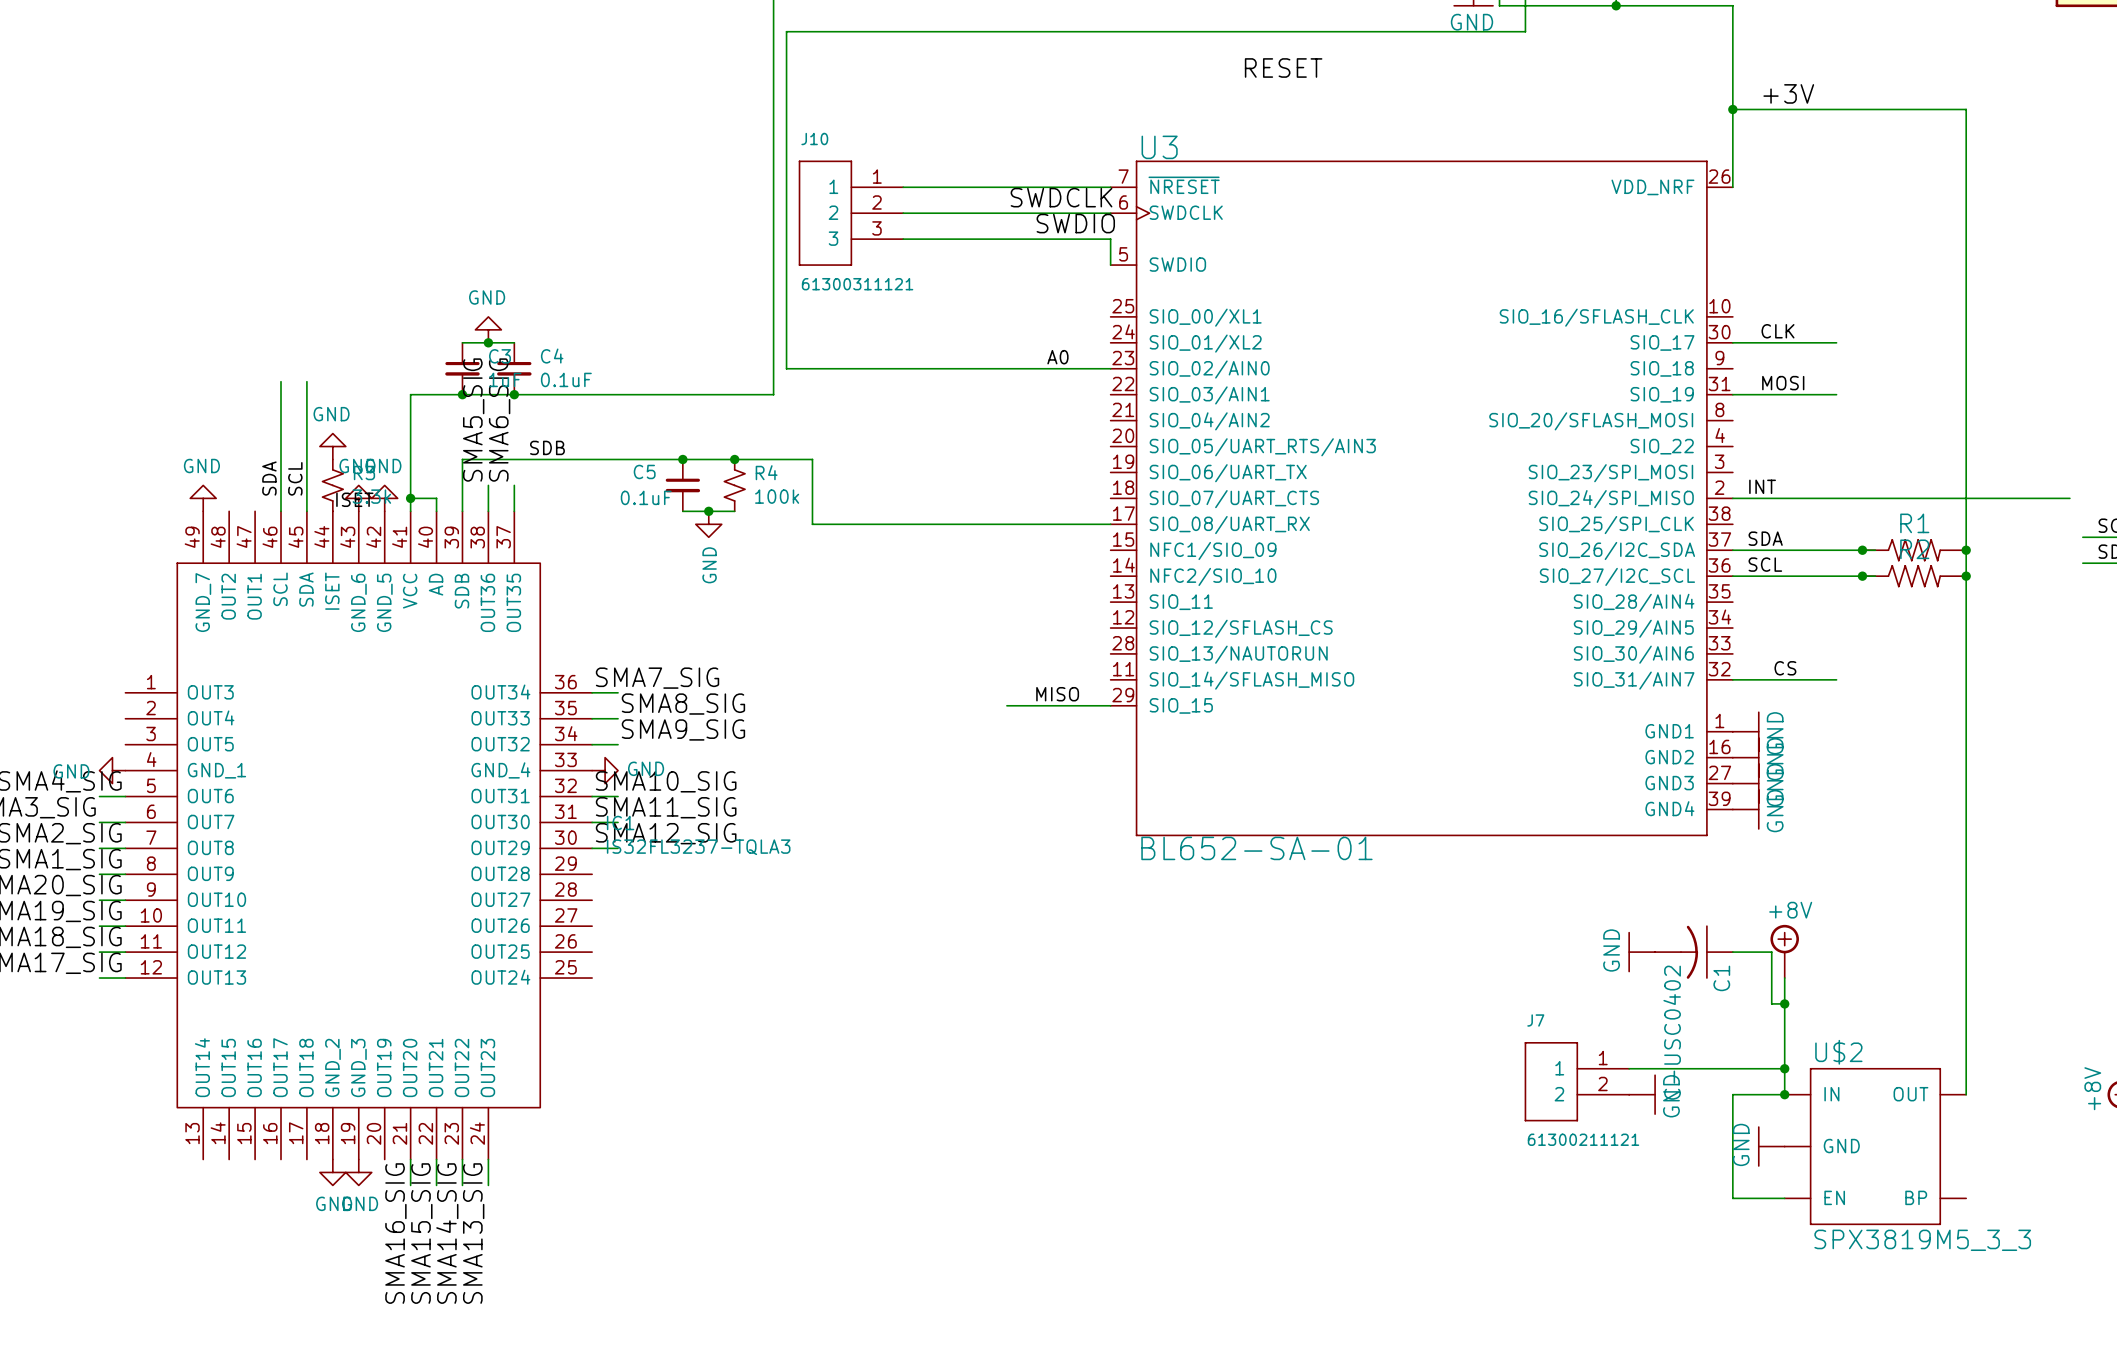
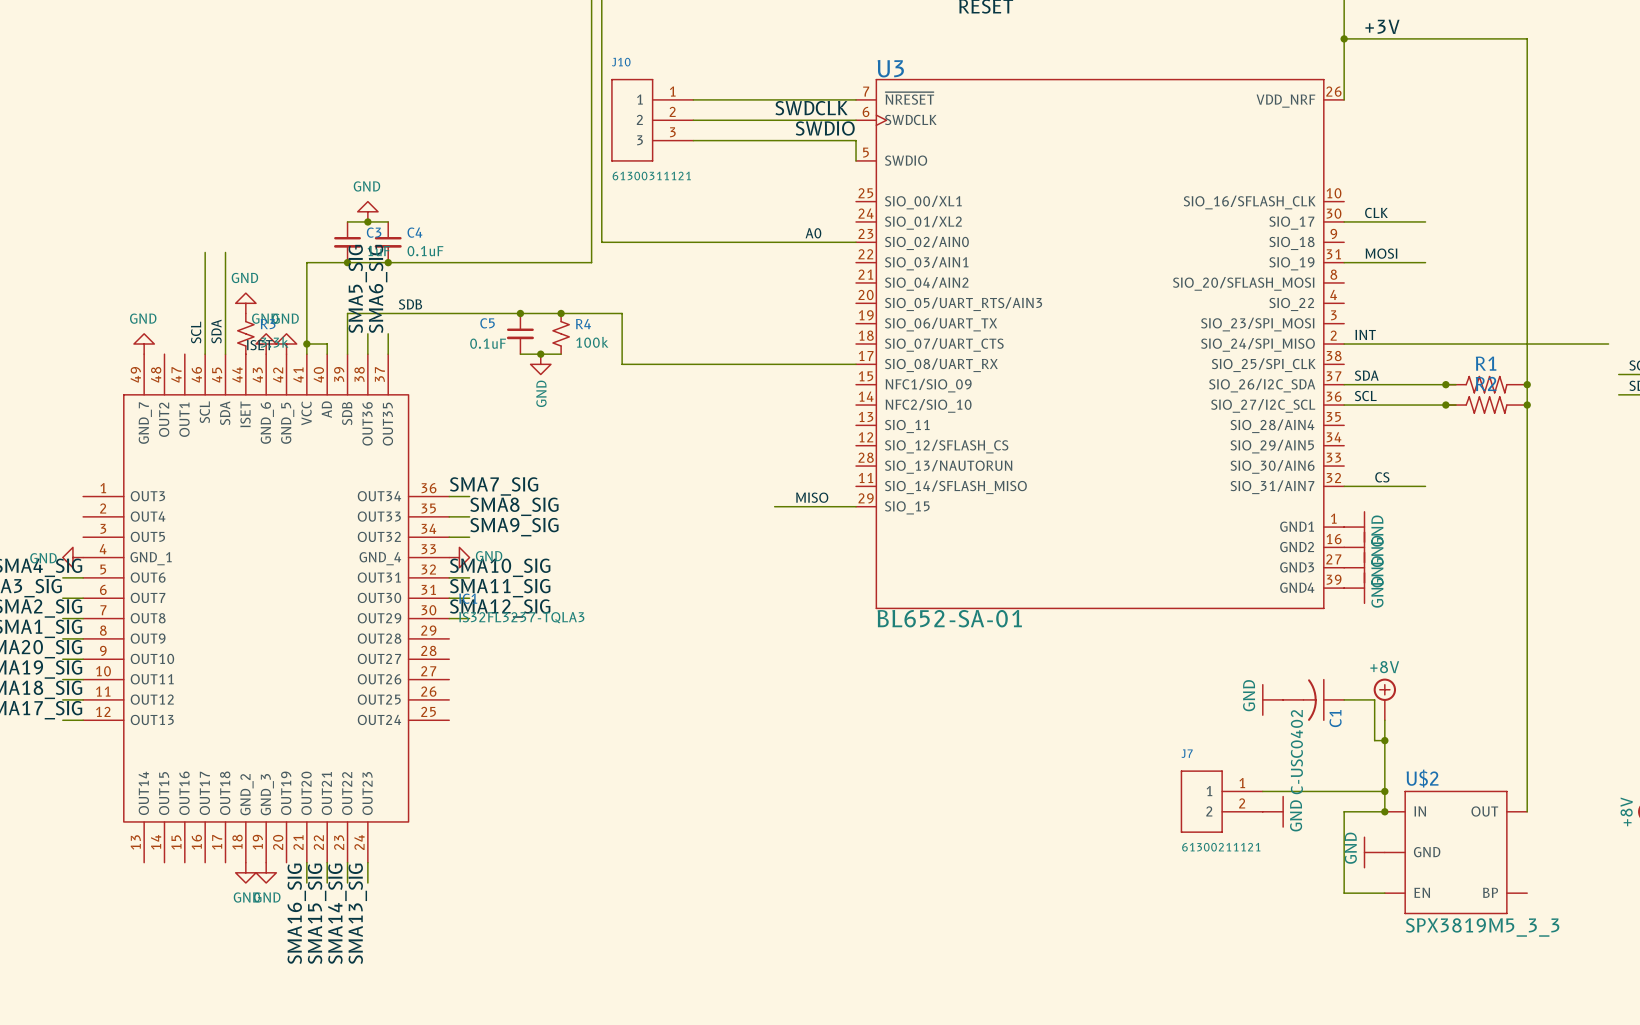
label: SDA (269, 478) -> SCL (196, 332)
label: SCL (295, 478) -> SDA (216, 331)

